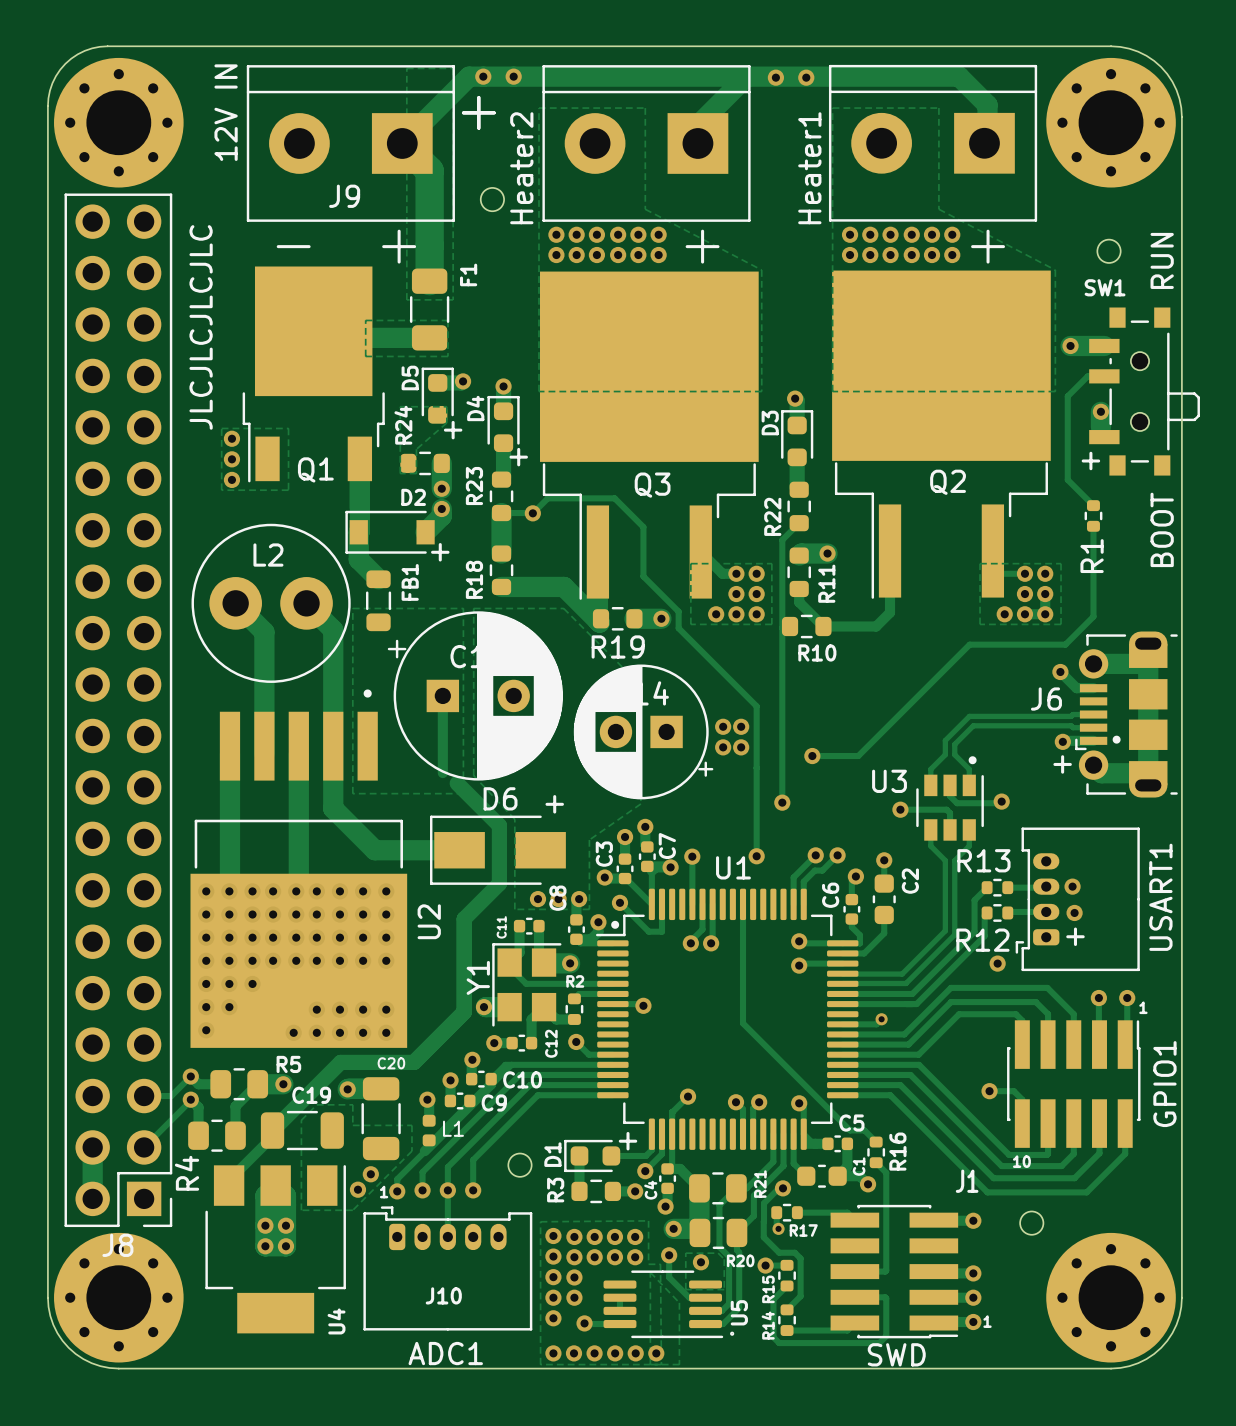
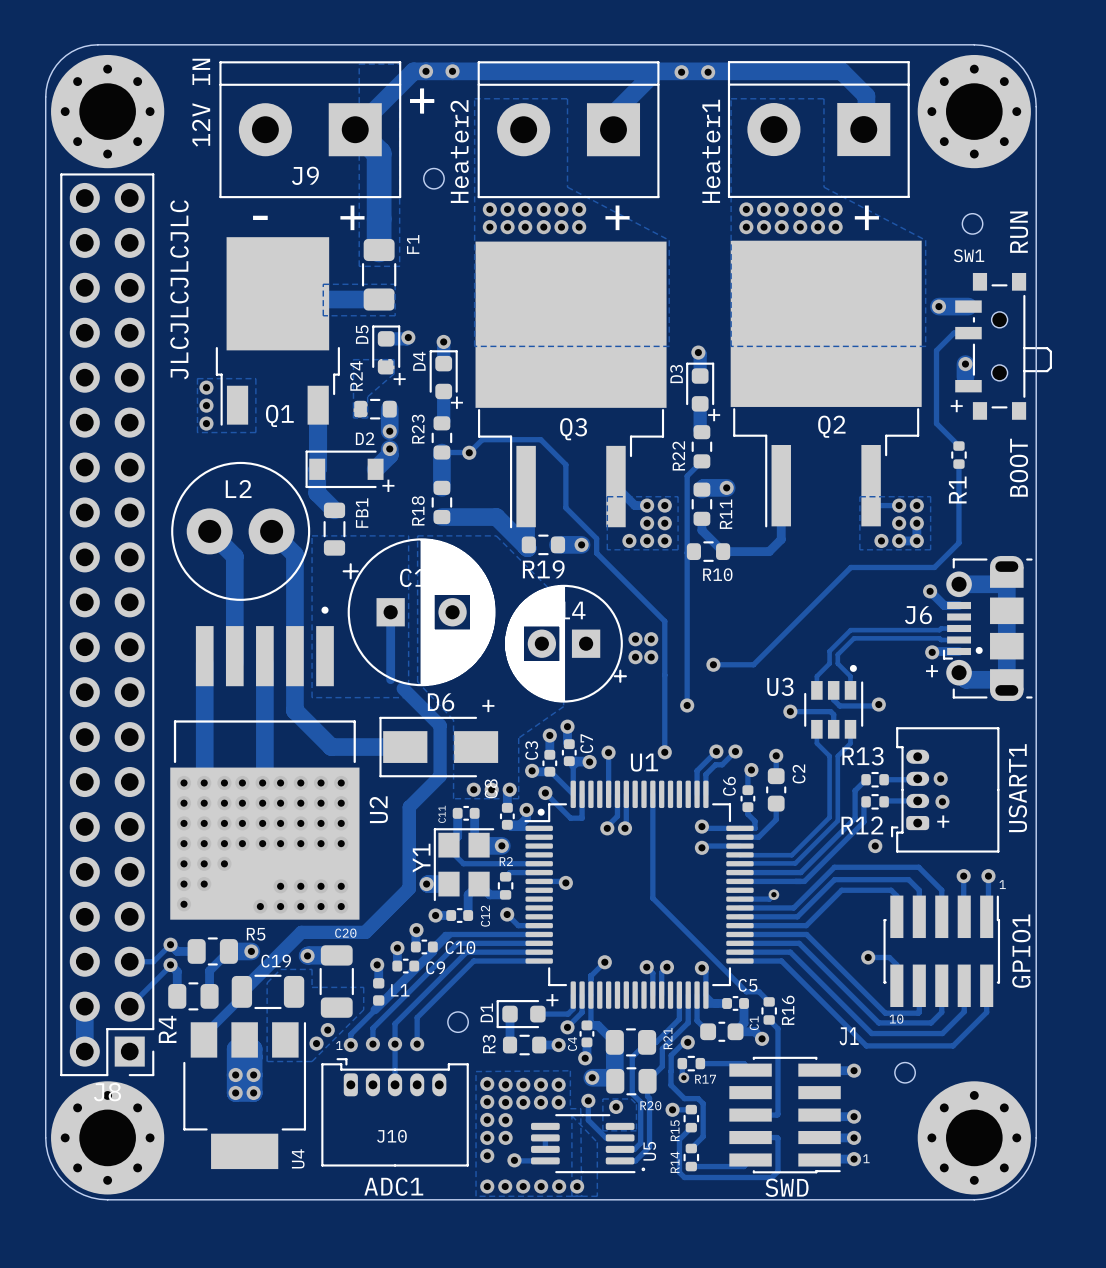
text: none -> + (714, 415)

